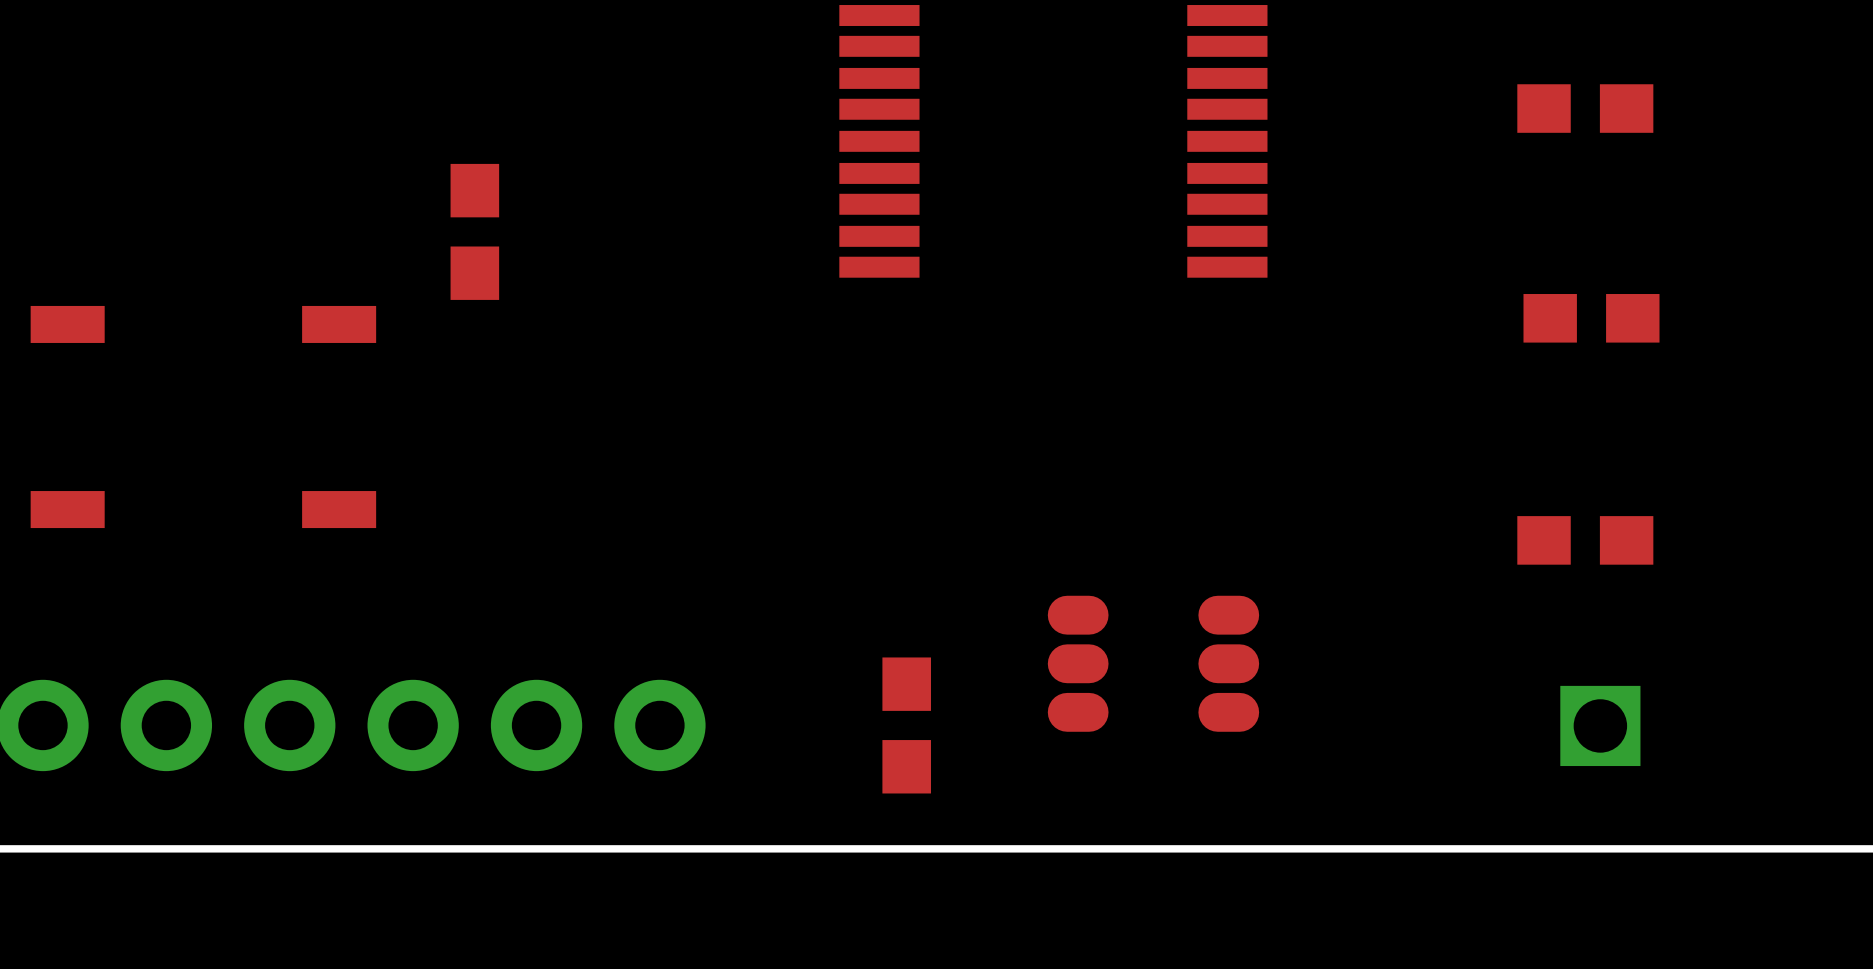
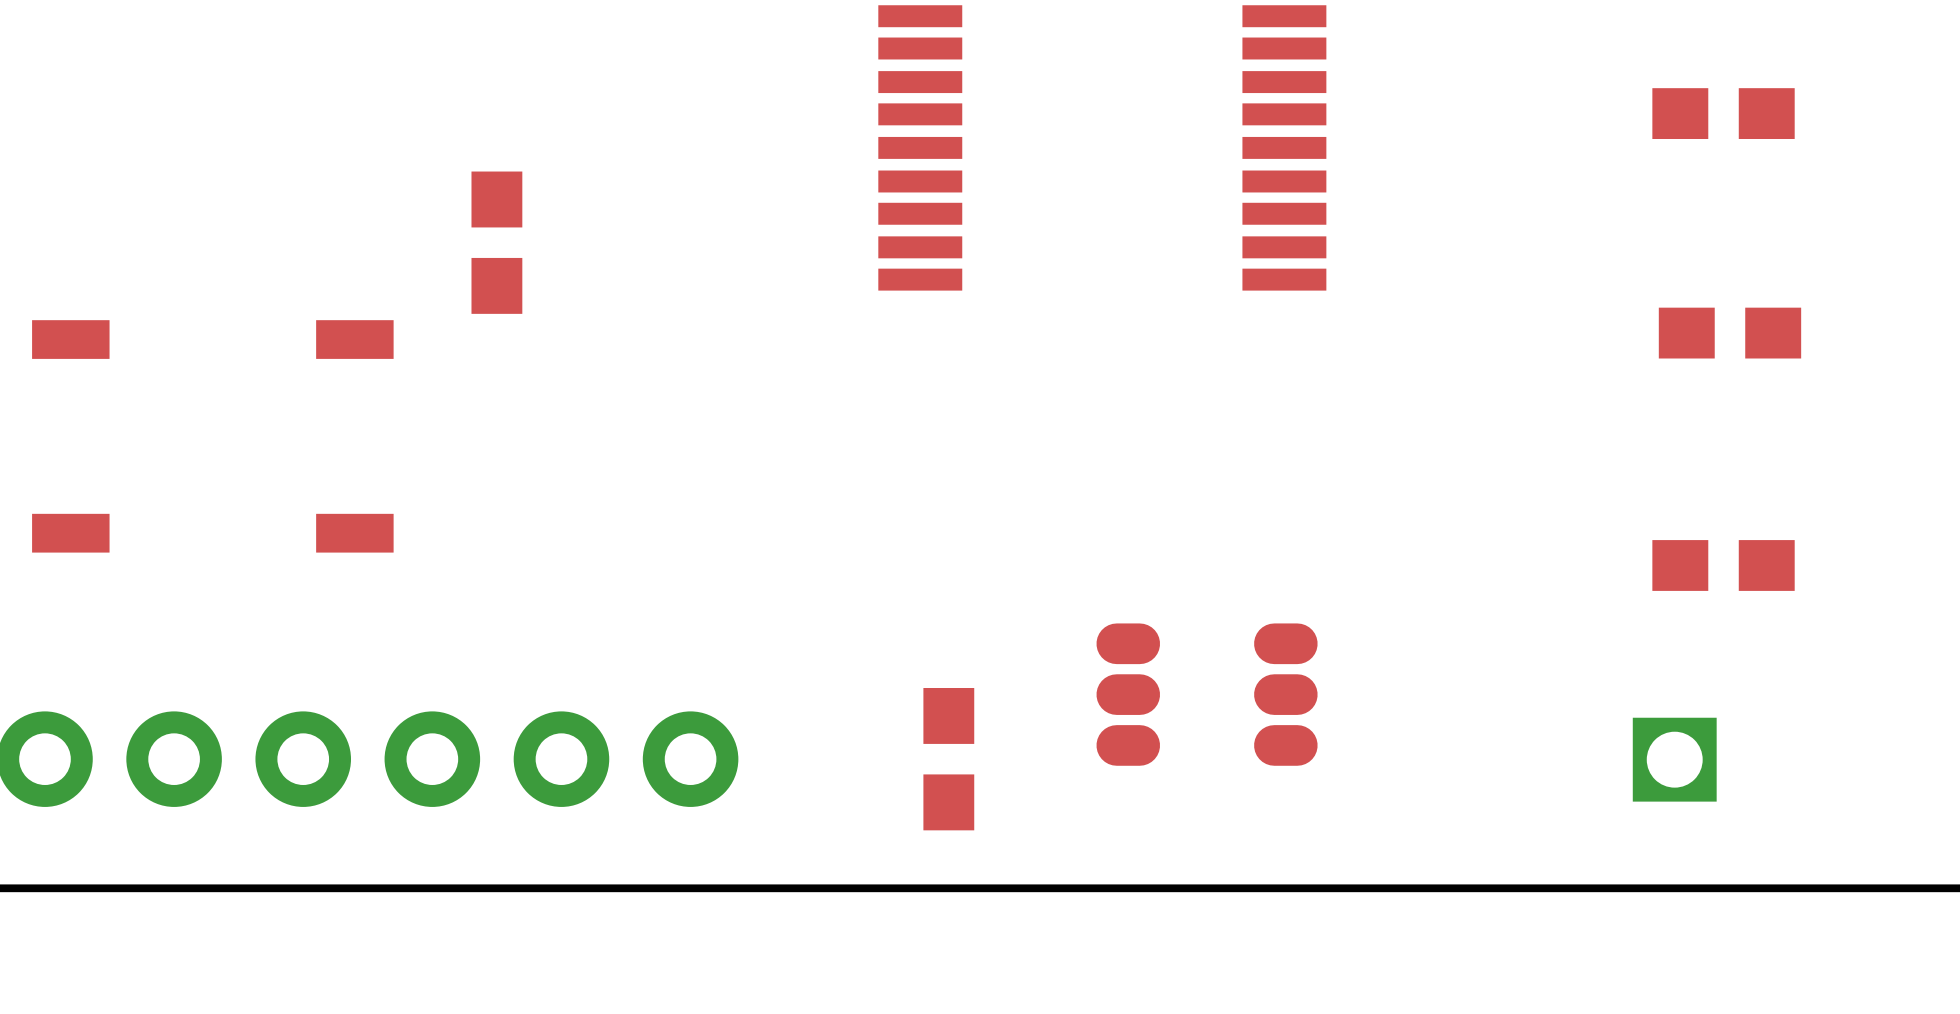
part position: (1585, 108) -> (1723, 113)
part position: (1591, 318) -> (1729, 333)
part position: (1585, 540) -> (1723, 565)

